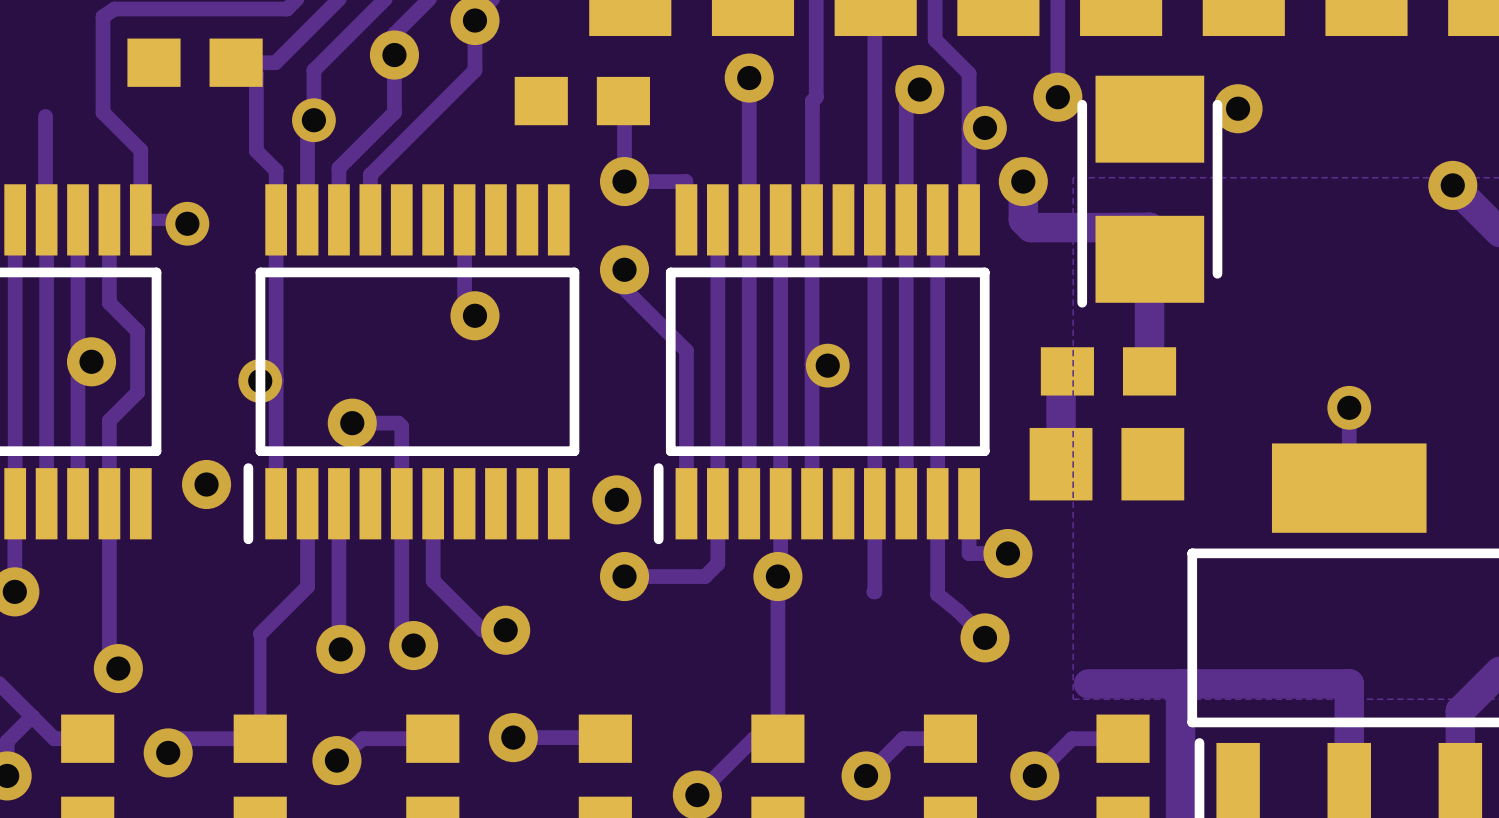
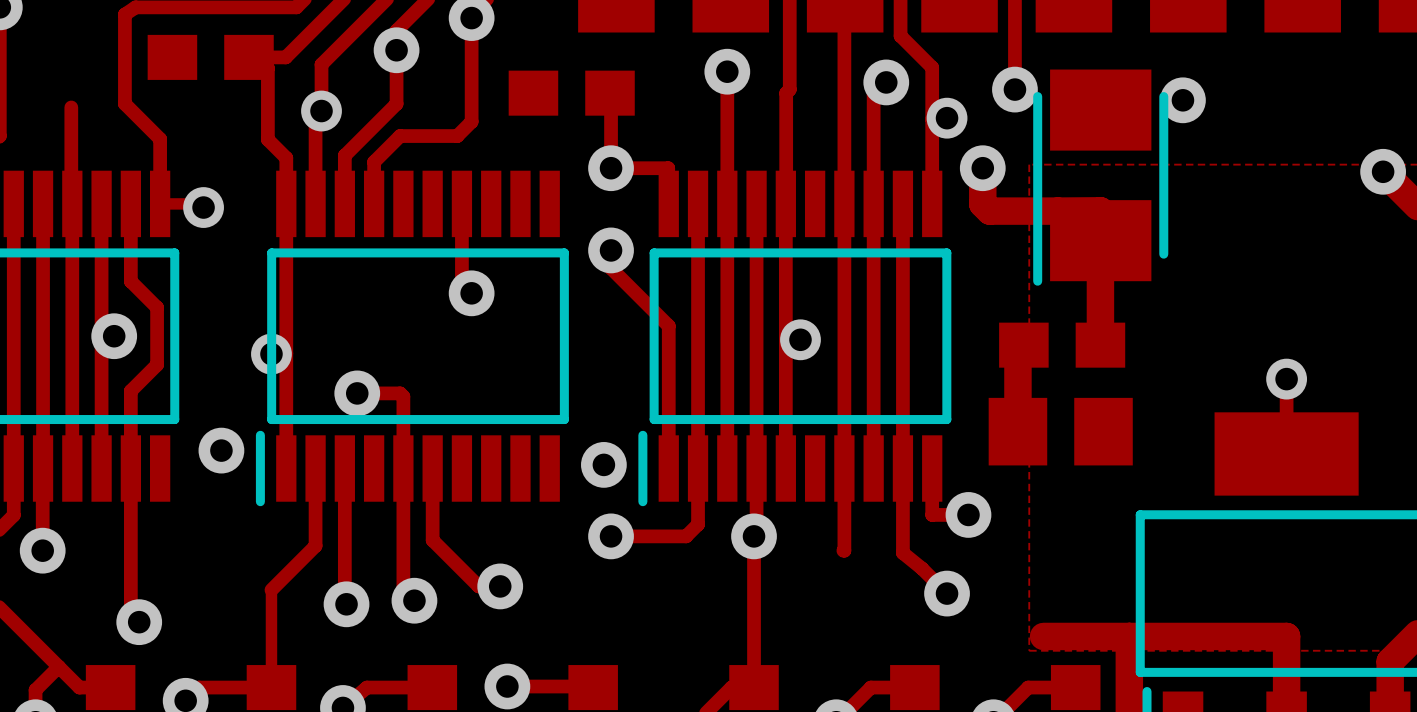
track: (474, 70) (398, 147) -> (471, 64) (471, 121) (457, 136) (400, 136)

